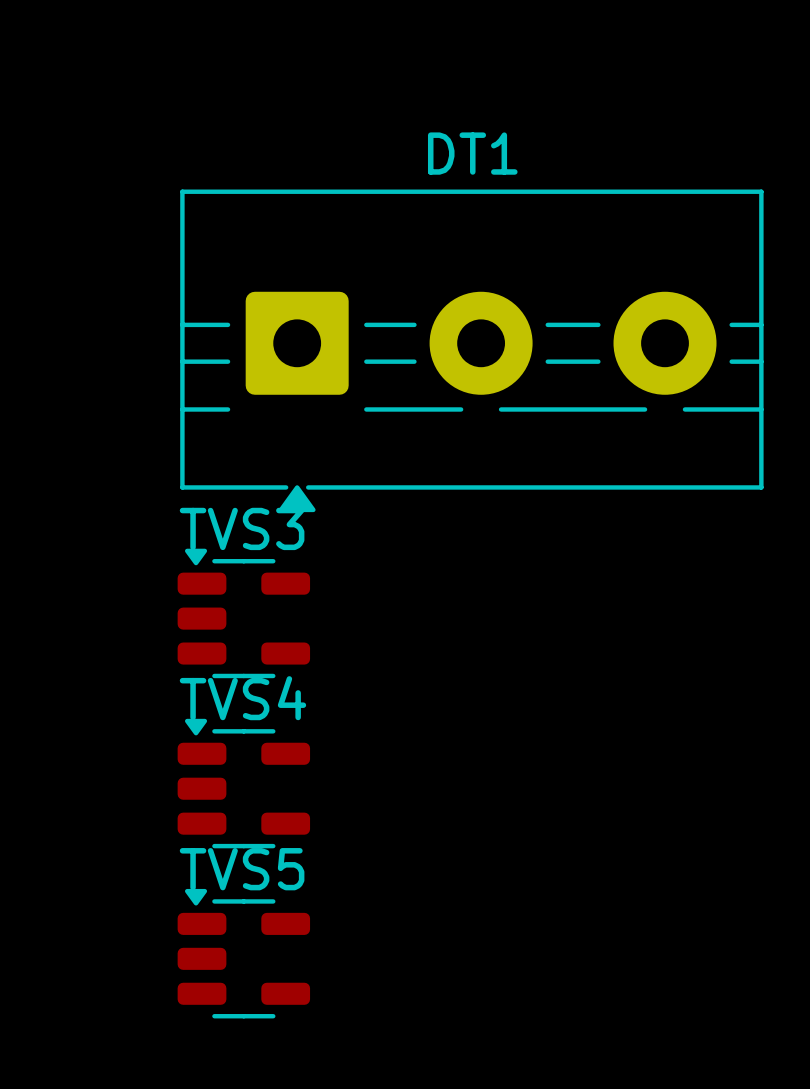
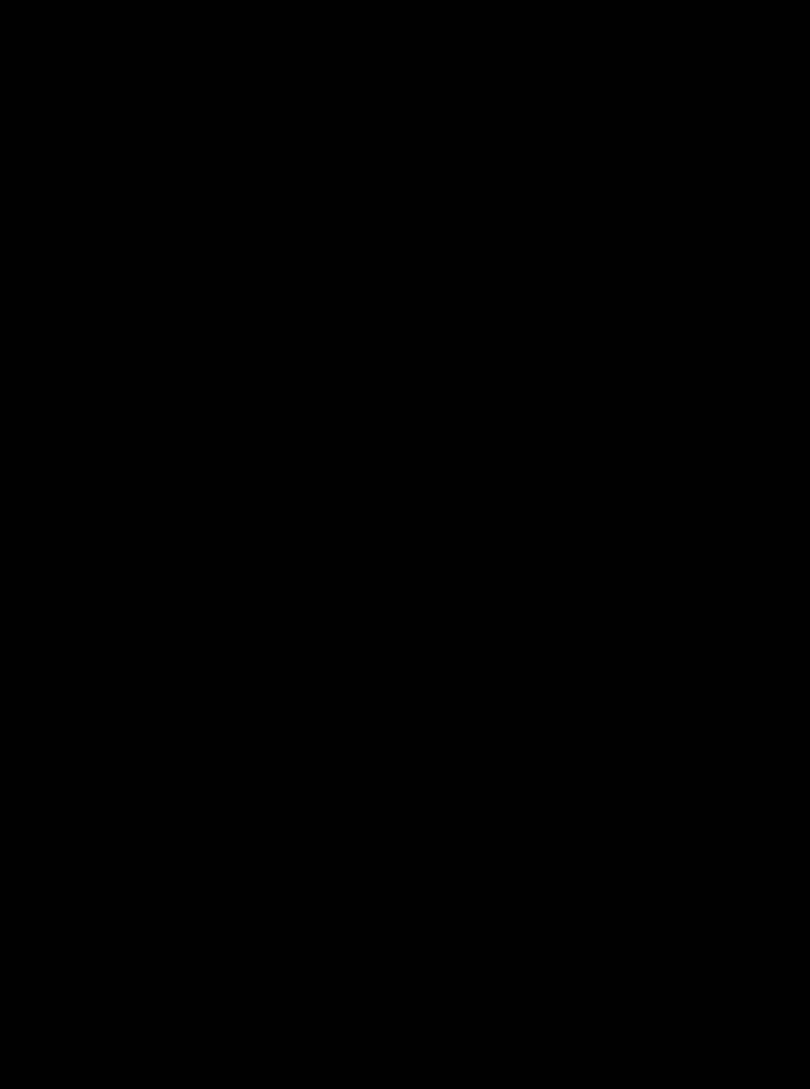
DT1: (471, 350) -> none
TVS3: (243, 613) -> none
TVS4: (243, 783) -> none
TVS5: (243, 953) -> none

